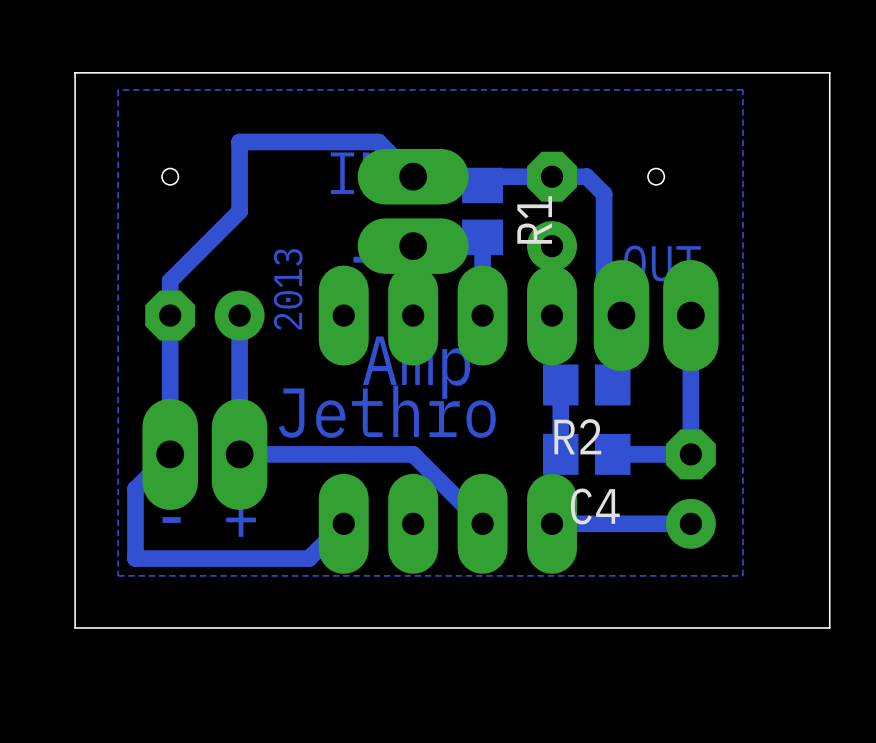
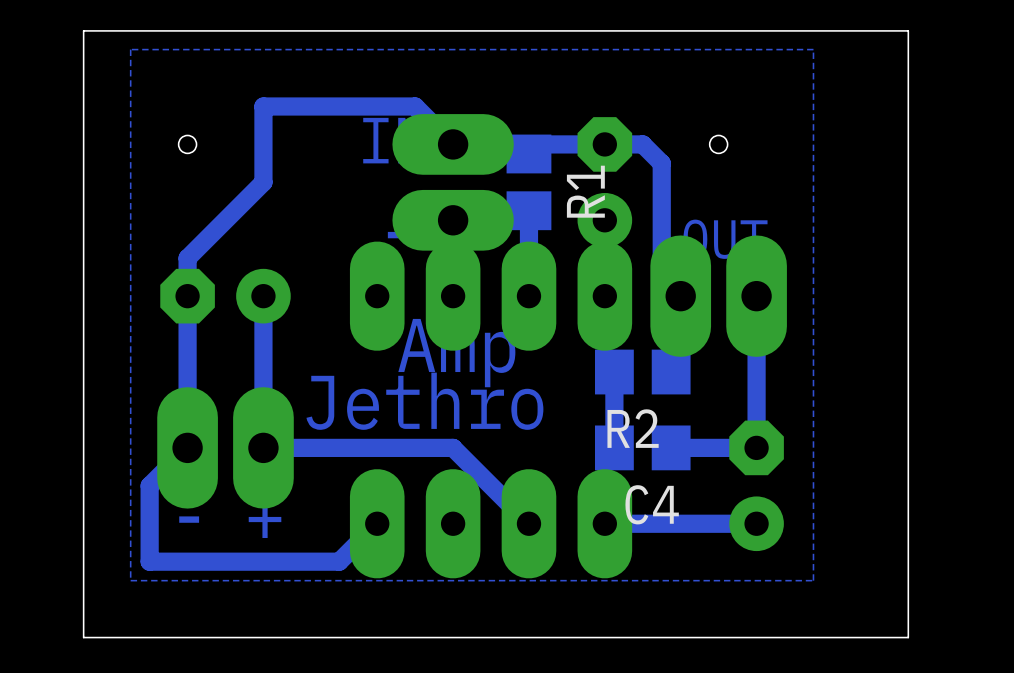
text: 2013 (288, 289) -> none

